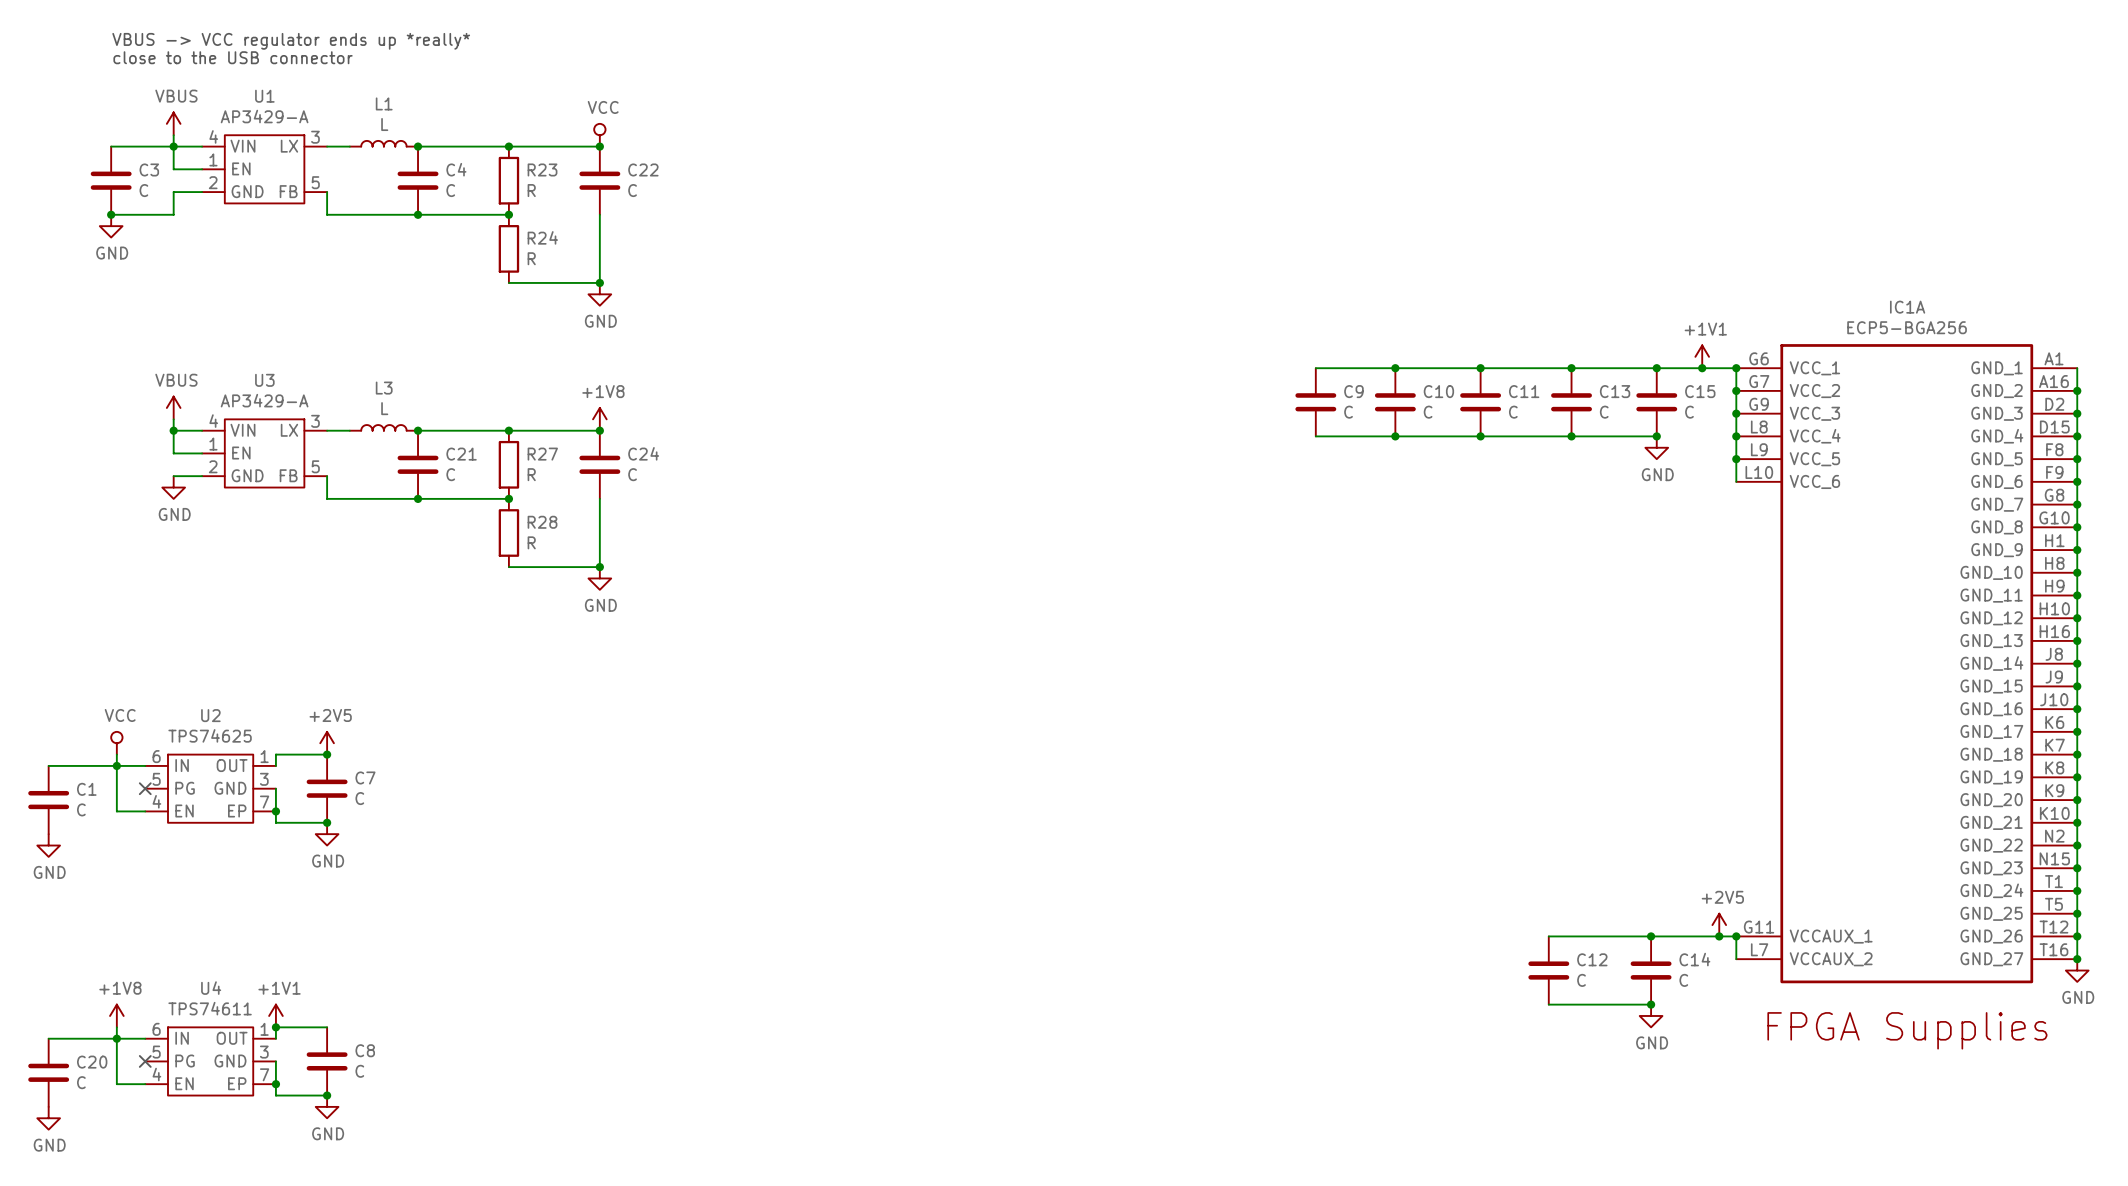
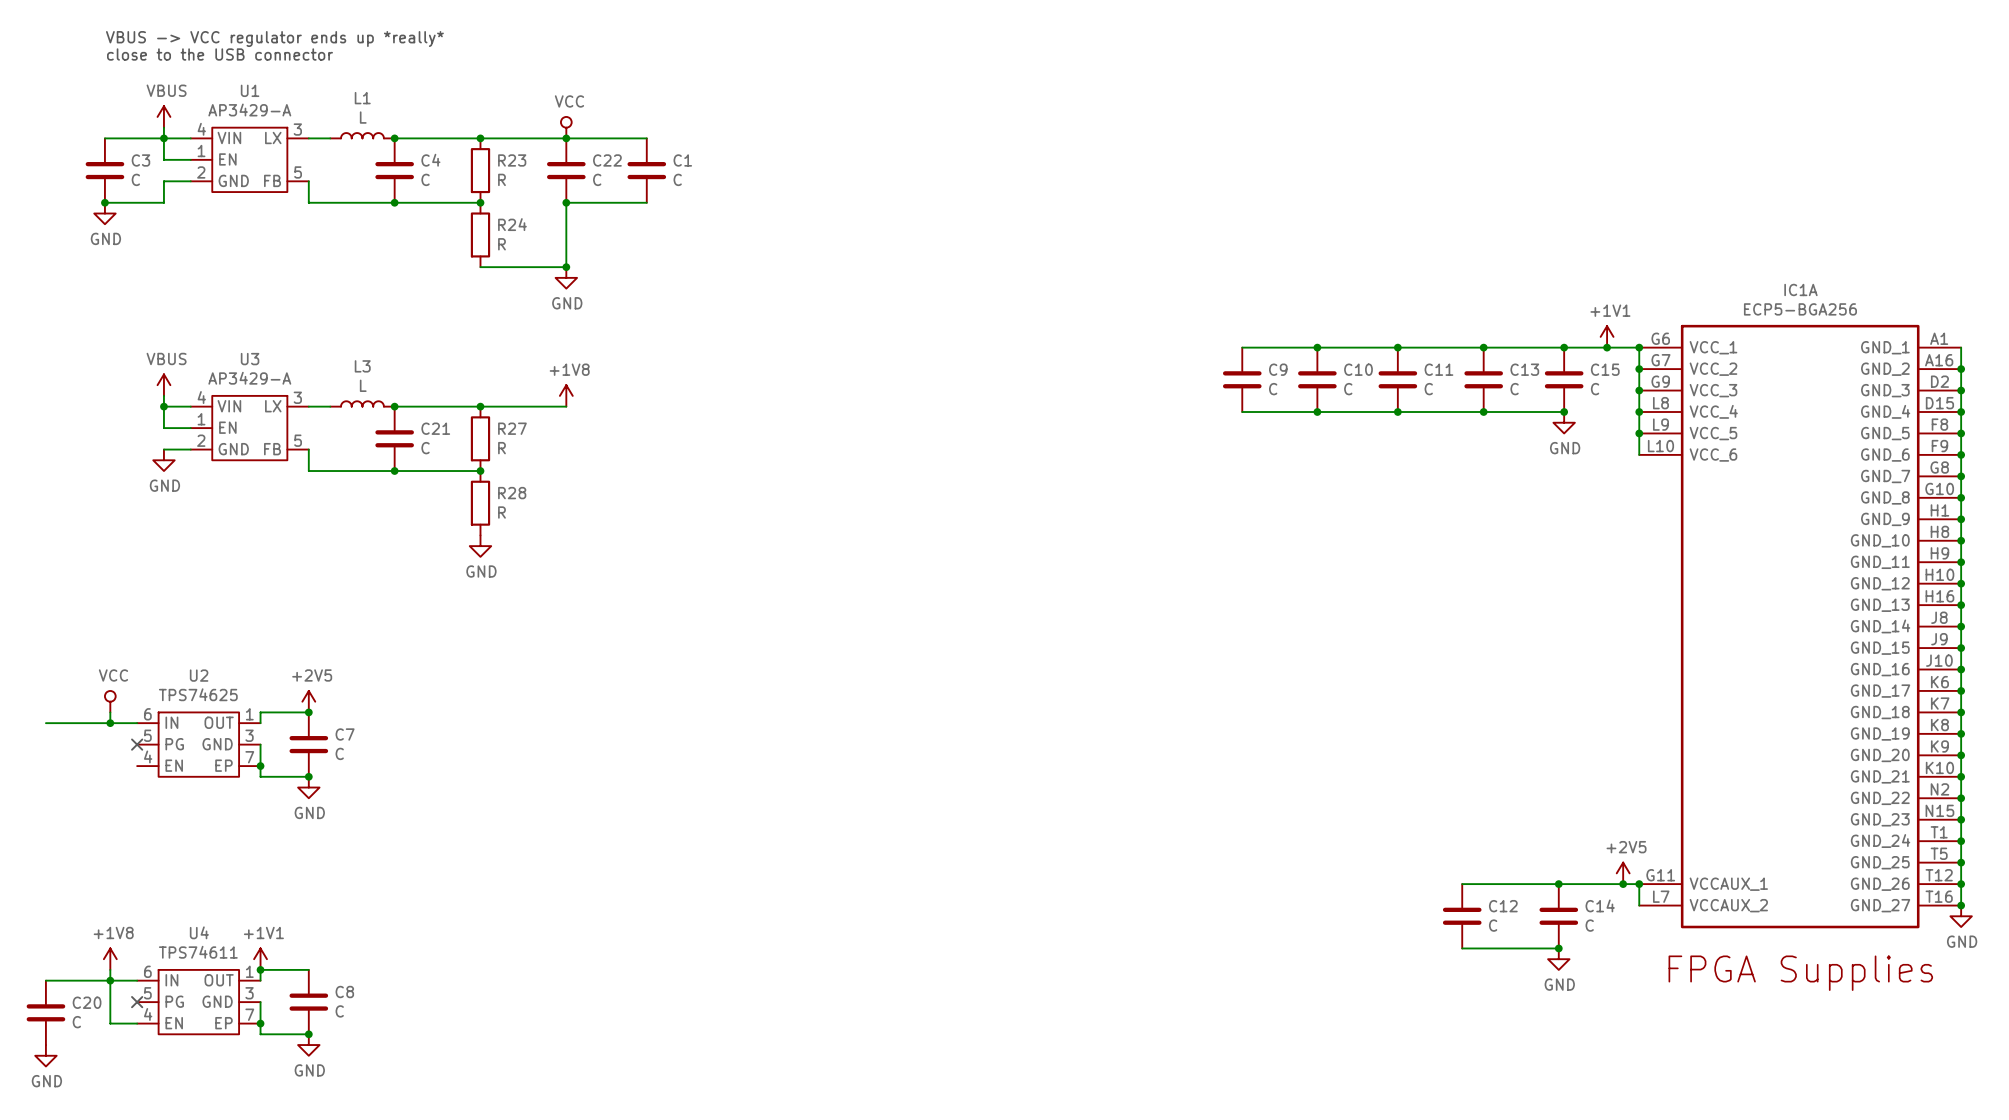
wire: none -> (566, 138) (646, 138)
wire: none -> (566, 202) (646, 202)
junction: none -> (566, 202)
junction: (599, 430) -> none
C24: C (599, 464) -> none
wire: (599, 498) (599, 567) (508, 567) -> none
junction: (599, 567) -> none
power symbol position: GND (599, 578) -> GND (480, 546)
wire: (116, 765) (116, 811) (145, 811) -> none
C1 position: (48, 800) -> (646, 170)
power symbol: GND (48, 845) -> none

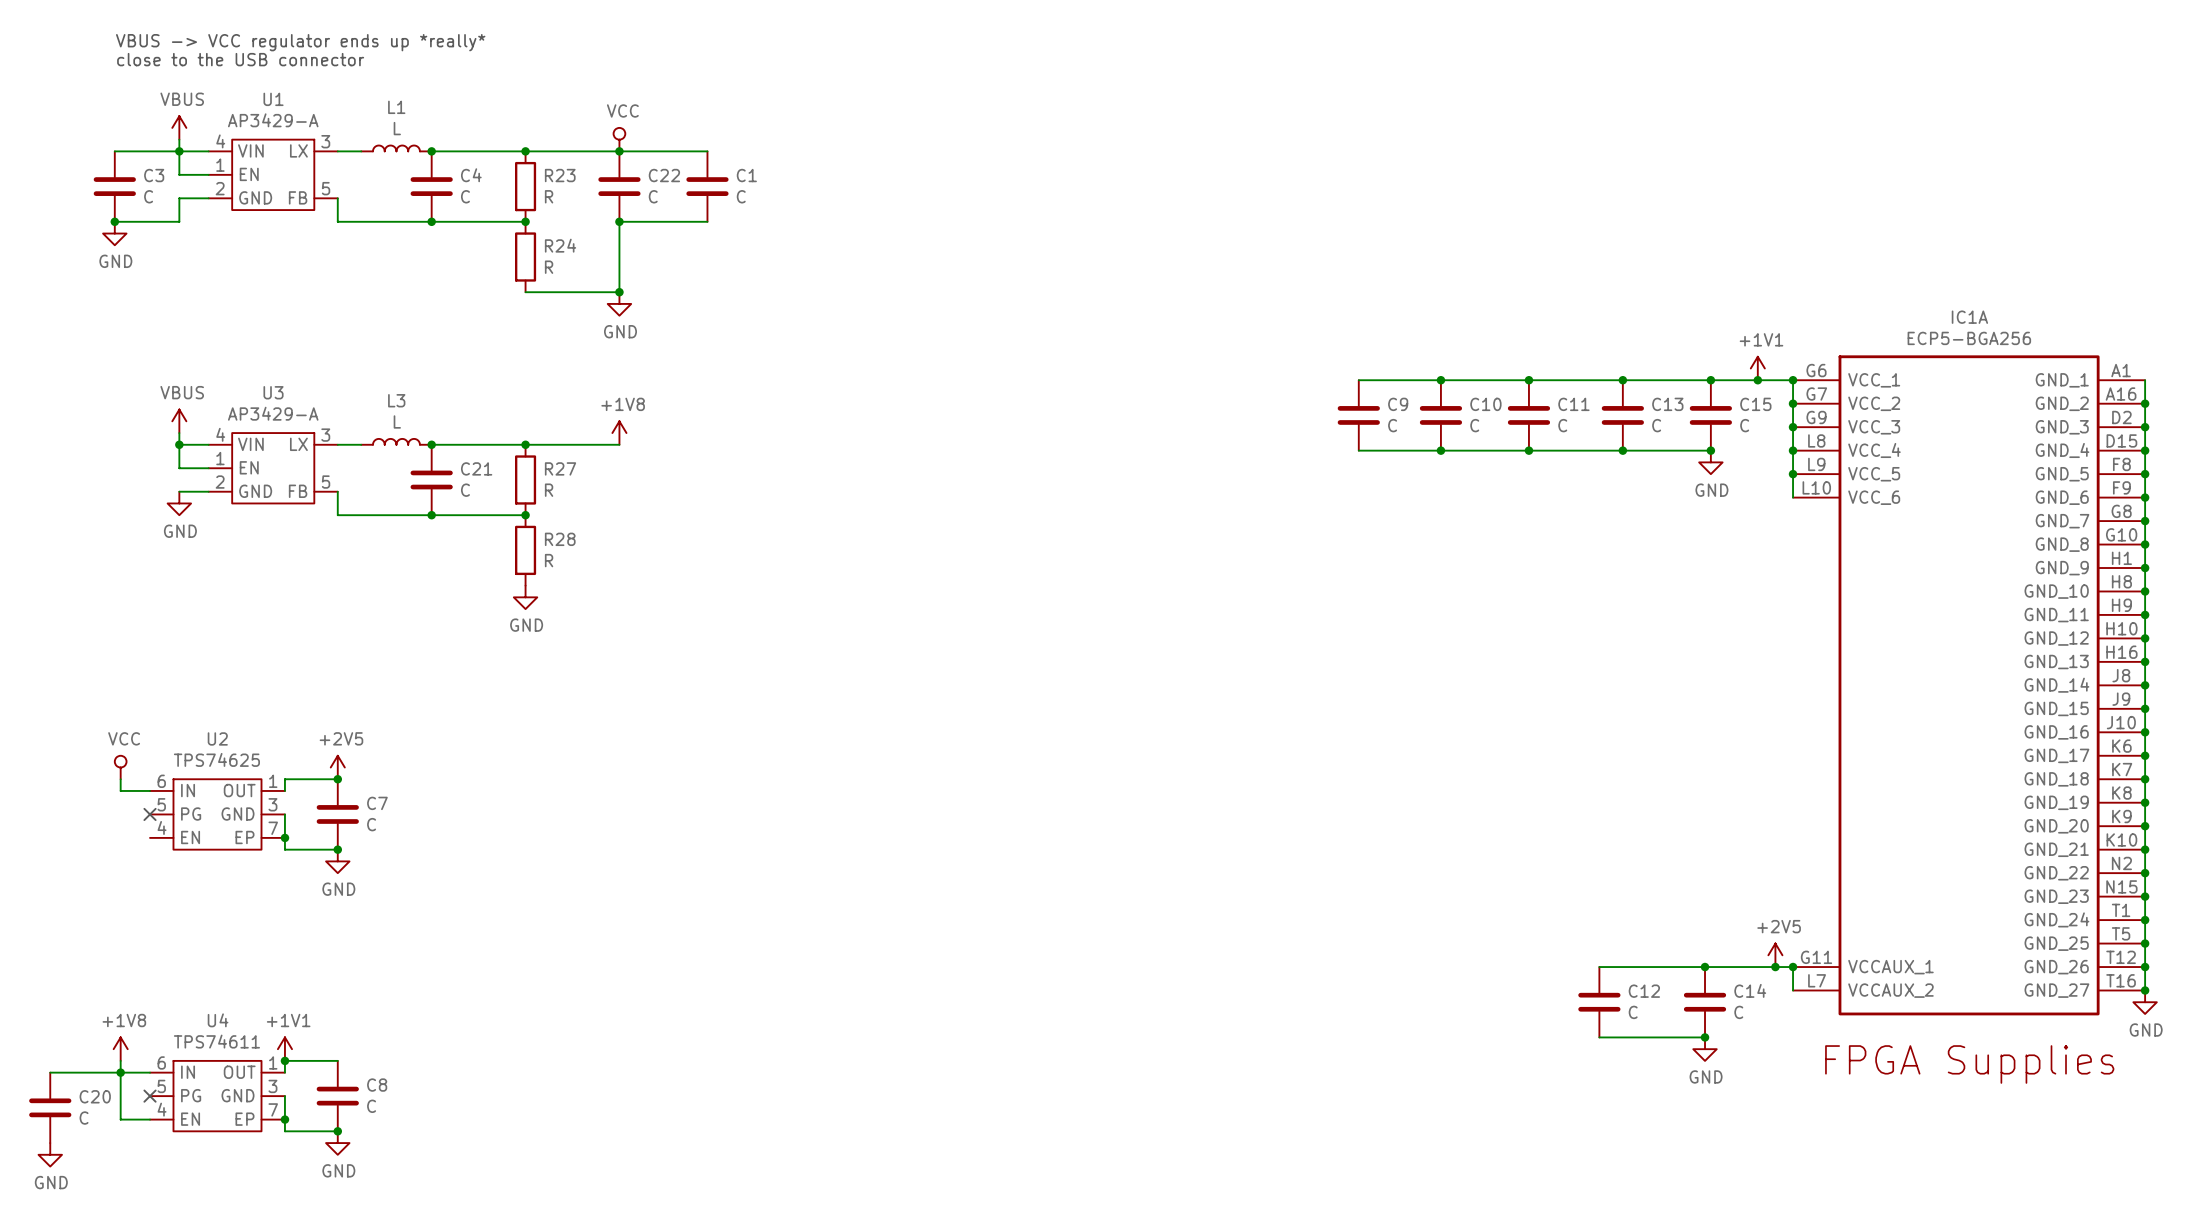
wire: (45, 723) (110, 723) -> none
junction: (110, 723) -> none

